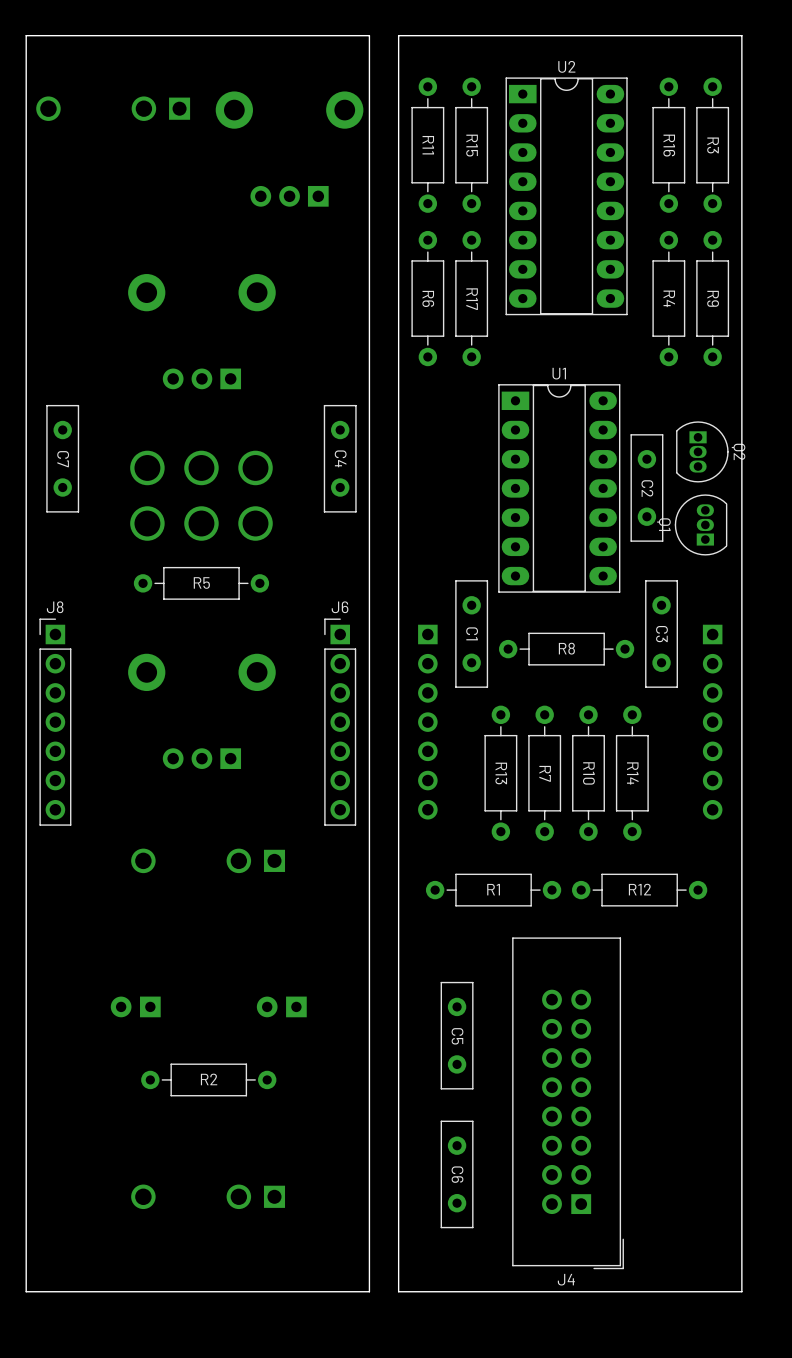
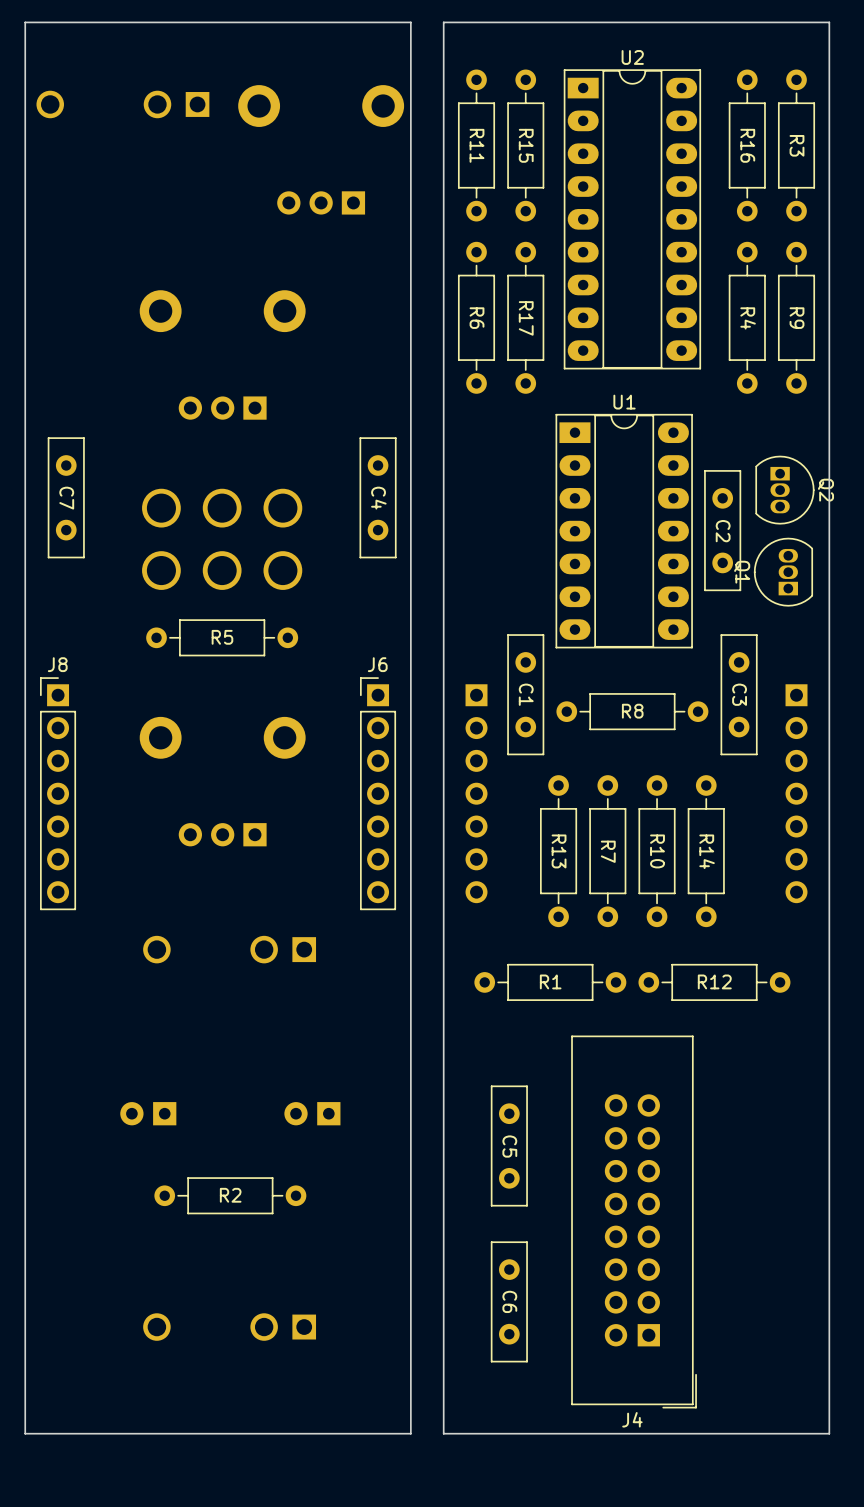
U2 footprint: [505, 77, 628, 316] -> [563, 69, 702, 370]

